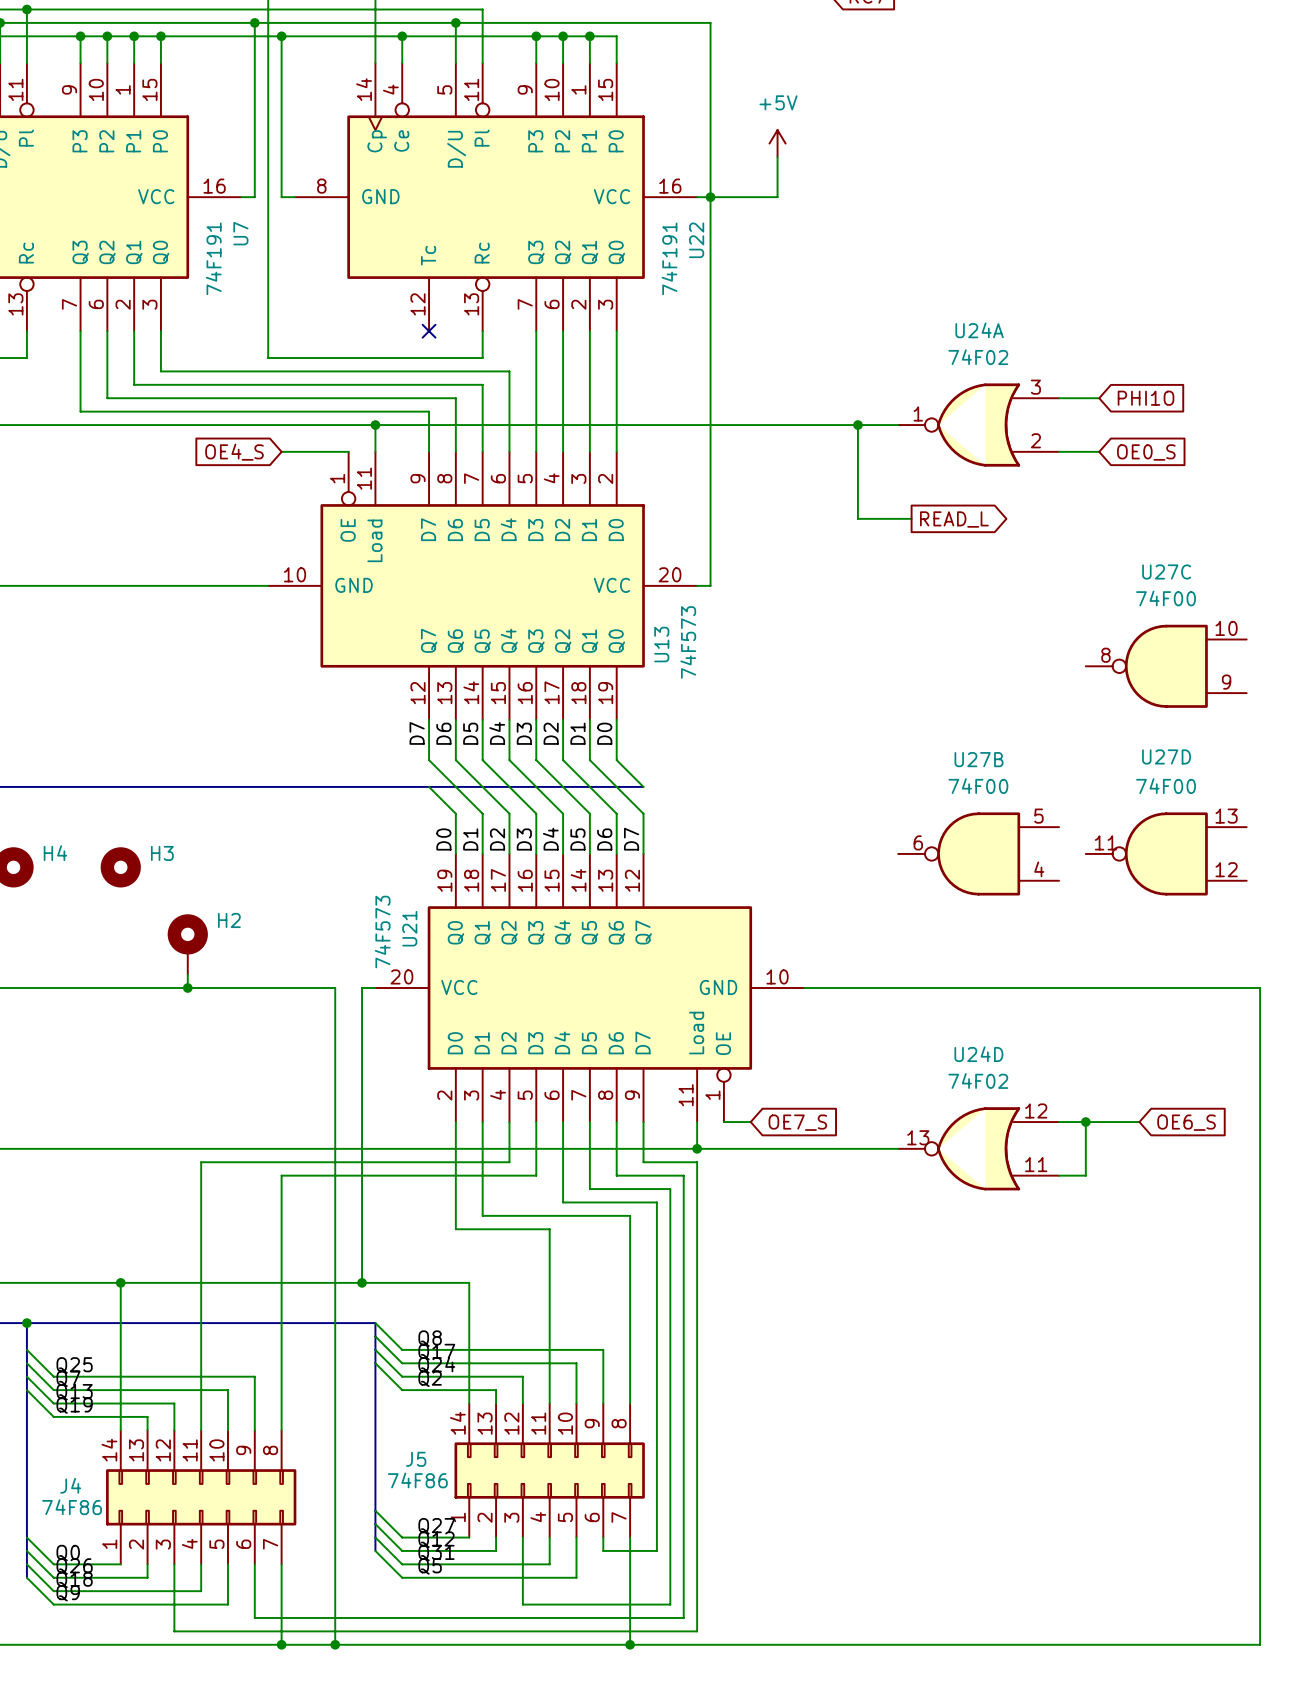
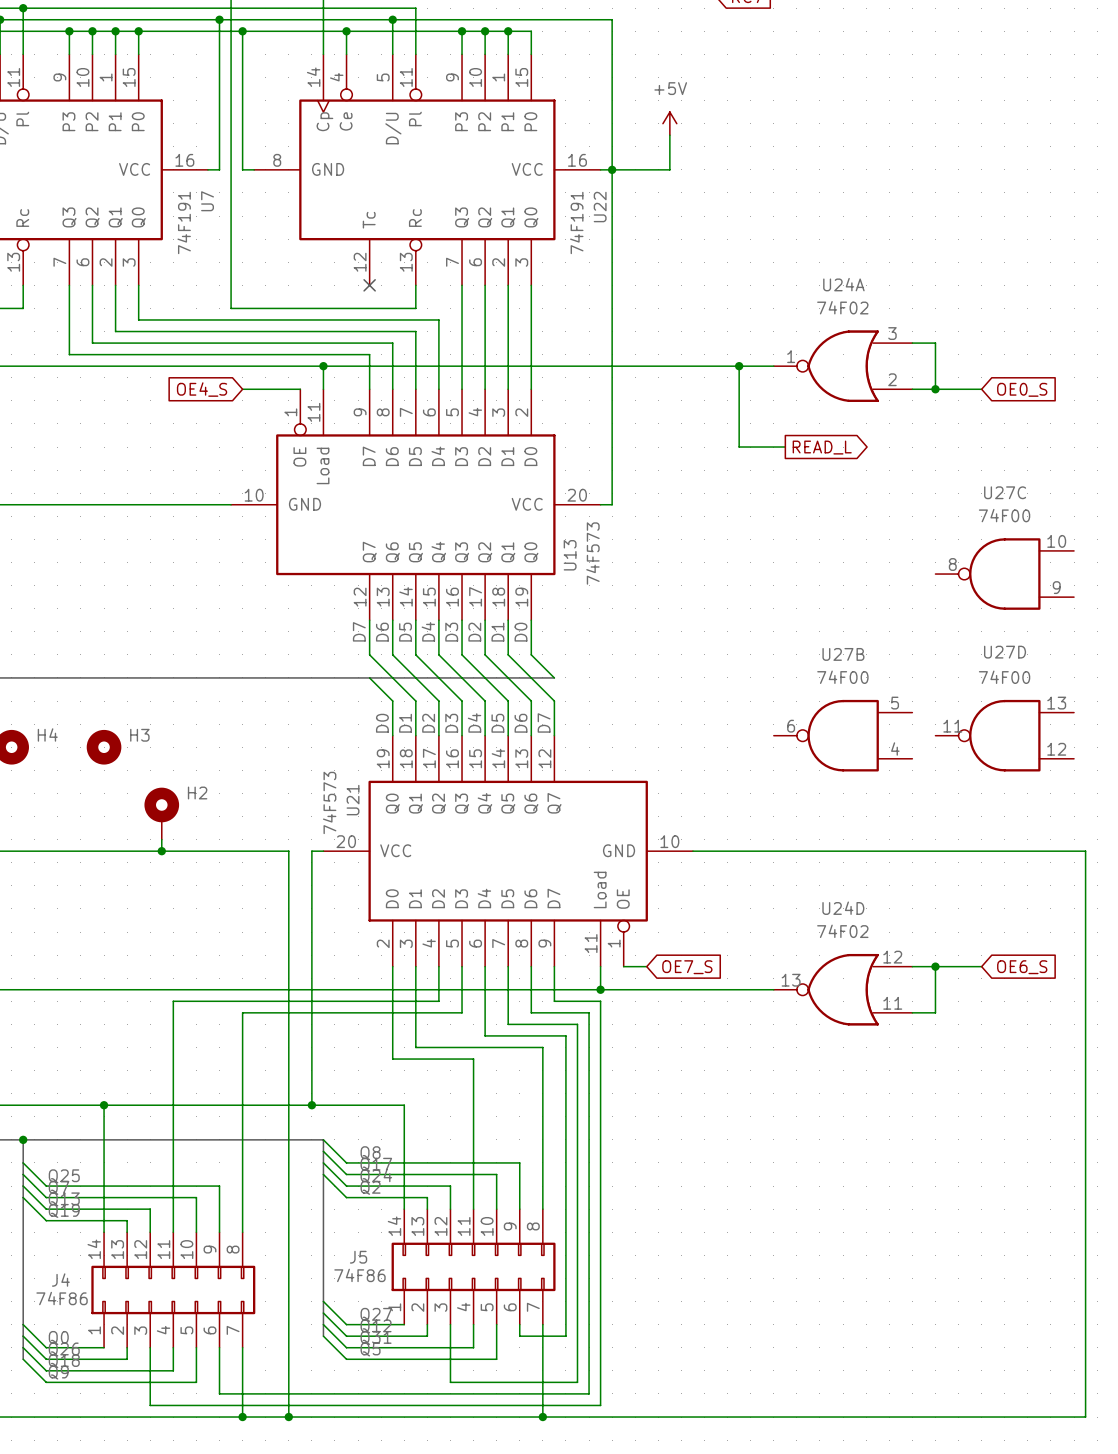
wire: (1085, 398) (1099, 398) -> (935, 343) (935, 389)
global label: PHI1O (1146, 398) -> none
junction: none -> (935, 389)
wire: none -> (947, 389) (981, 389)
global label position: OE0_S (1146, 452) -> OE0_S (1022, 389)

